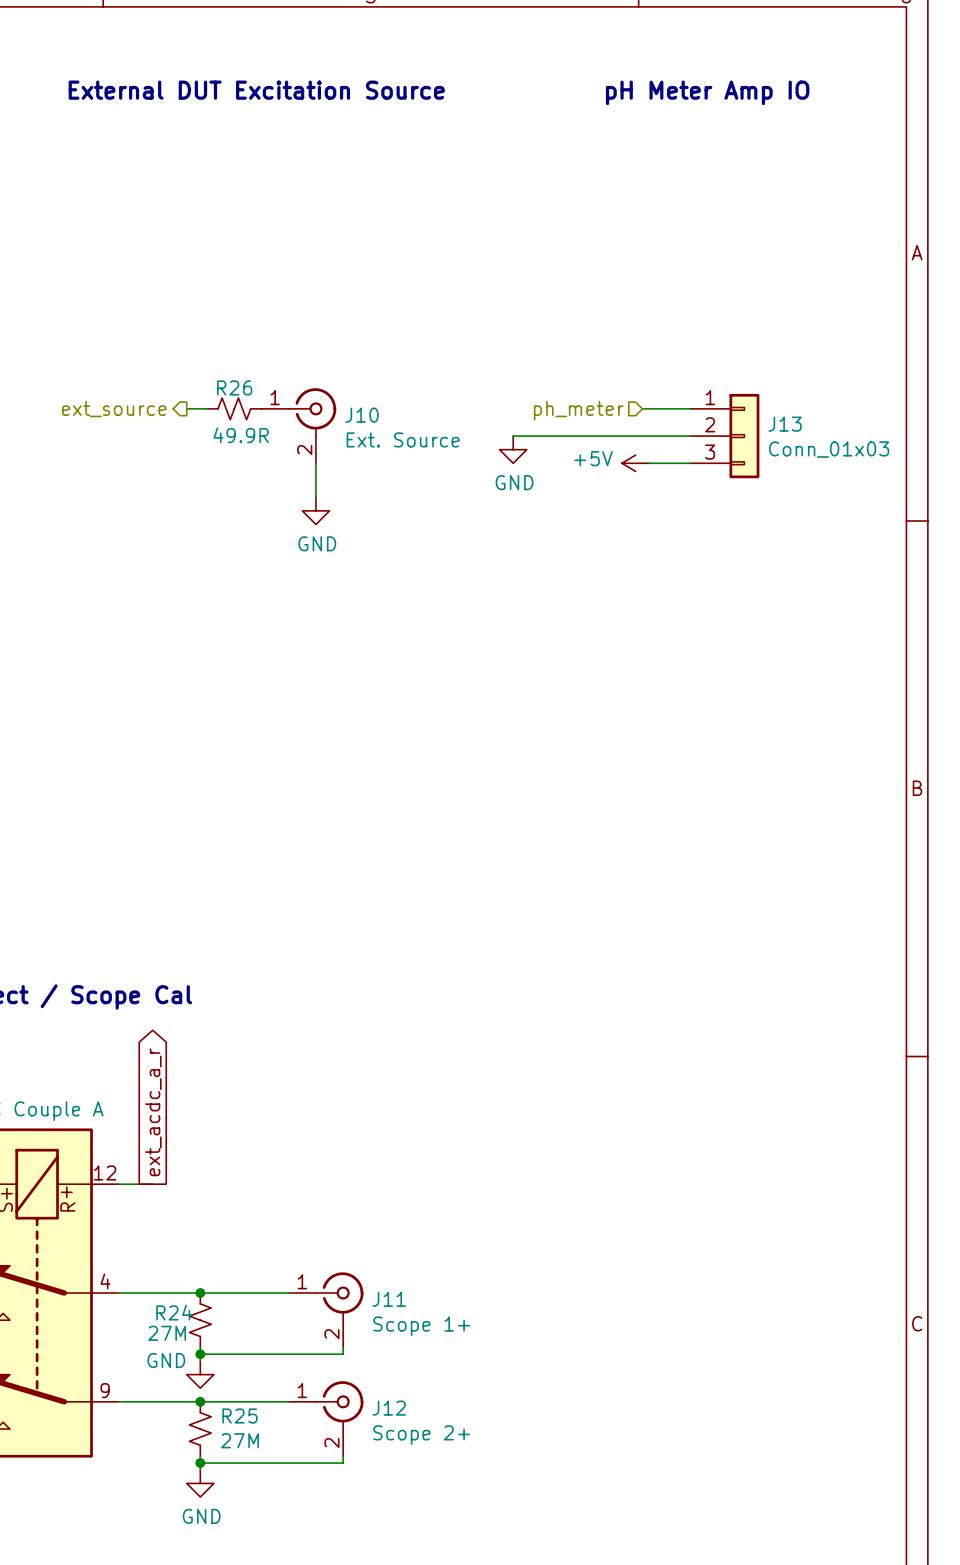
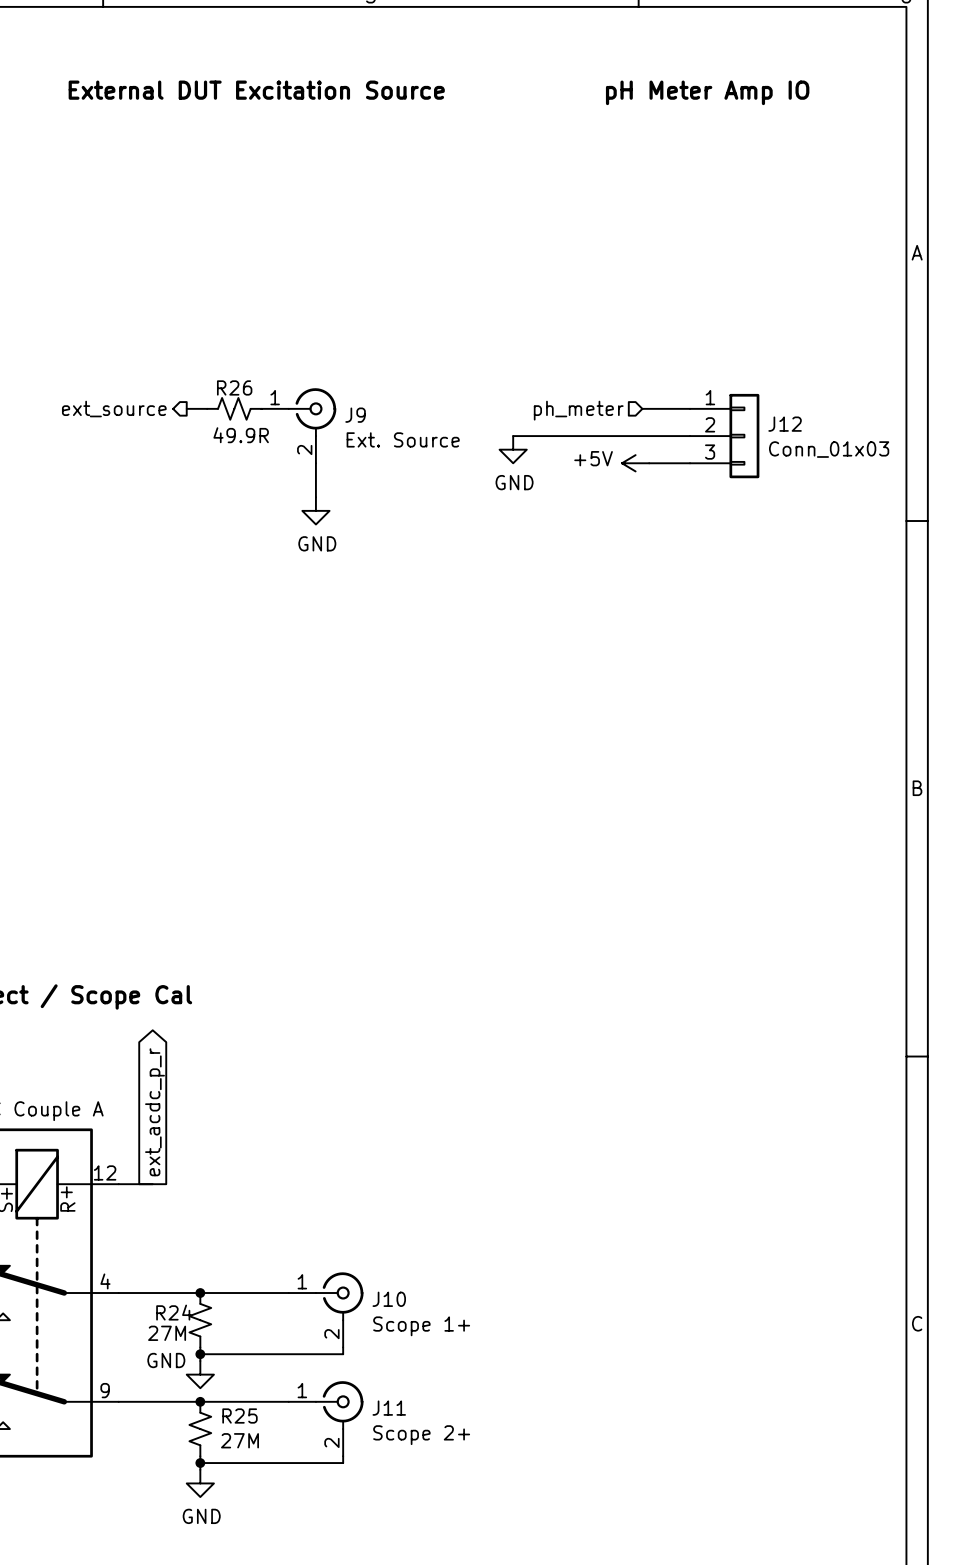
J10 name: J10 (362, 415) -> J9 (355, 415)
J13 name: J13 (785, 424) -> J12 (785, 424)
global label: ext_acdc_a_r (153, 1112) -> ext_acdc_p_r (155, 1112)
J11 name: J11 (389, 1299) -> J10 (389, 1299)
J12 name: J12 (389, 1408) -> J11 (389, 1408)

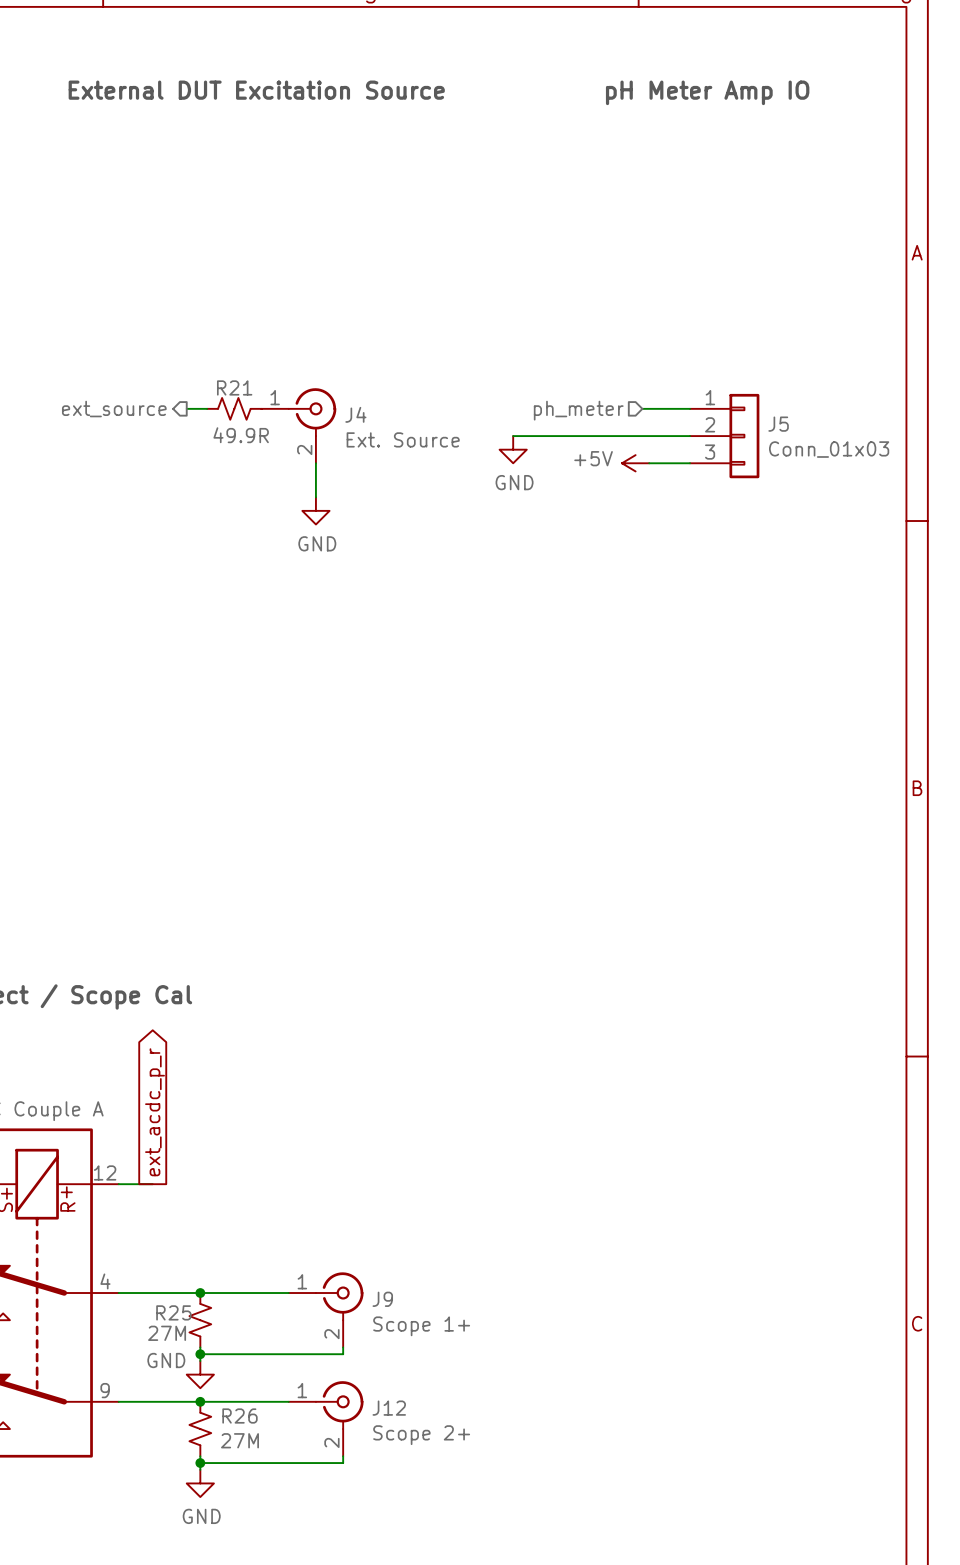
R26 name: R26 (234, 387) -> R21 (234, 387)
J9 name: J9 (355, 415) -> J4 (355, 414)
J12 name: J12 (785, 424) -> J5 (778, 424)
J10 name: J10 (389, 1299) -> J9 (382, 1299)
R24 name: R24 (174, 1312) -> R25 (173, 1312)
J11 name: J11 (389, 1408) -> J12 (389, 1408)
R25 name: R25 (239, 1416) -> R26 (239, 1416)

